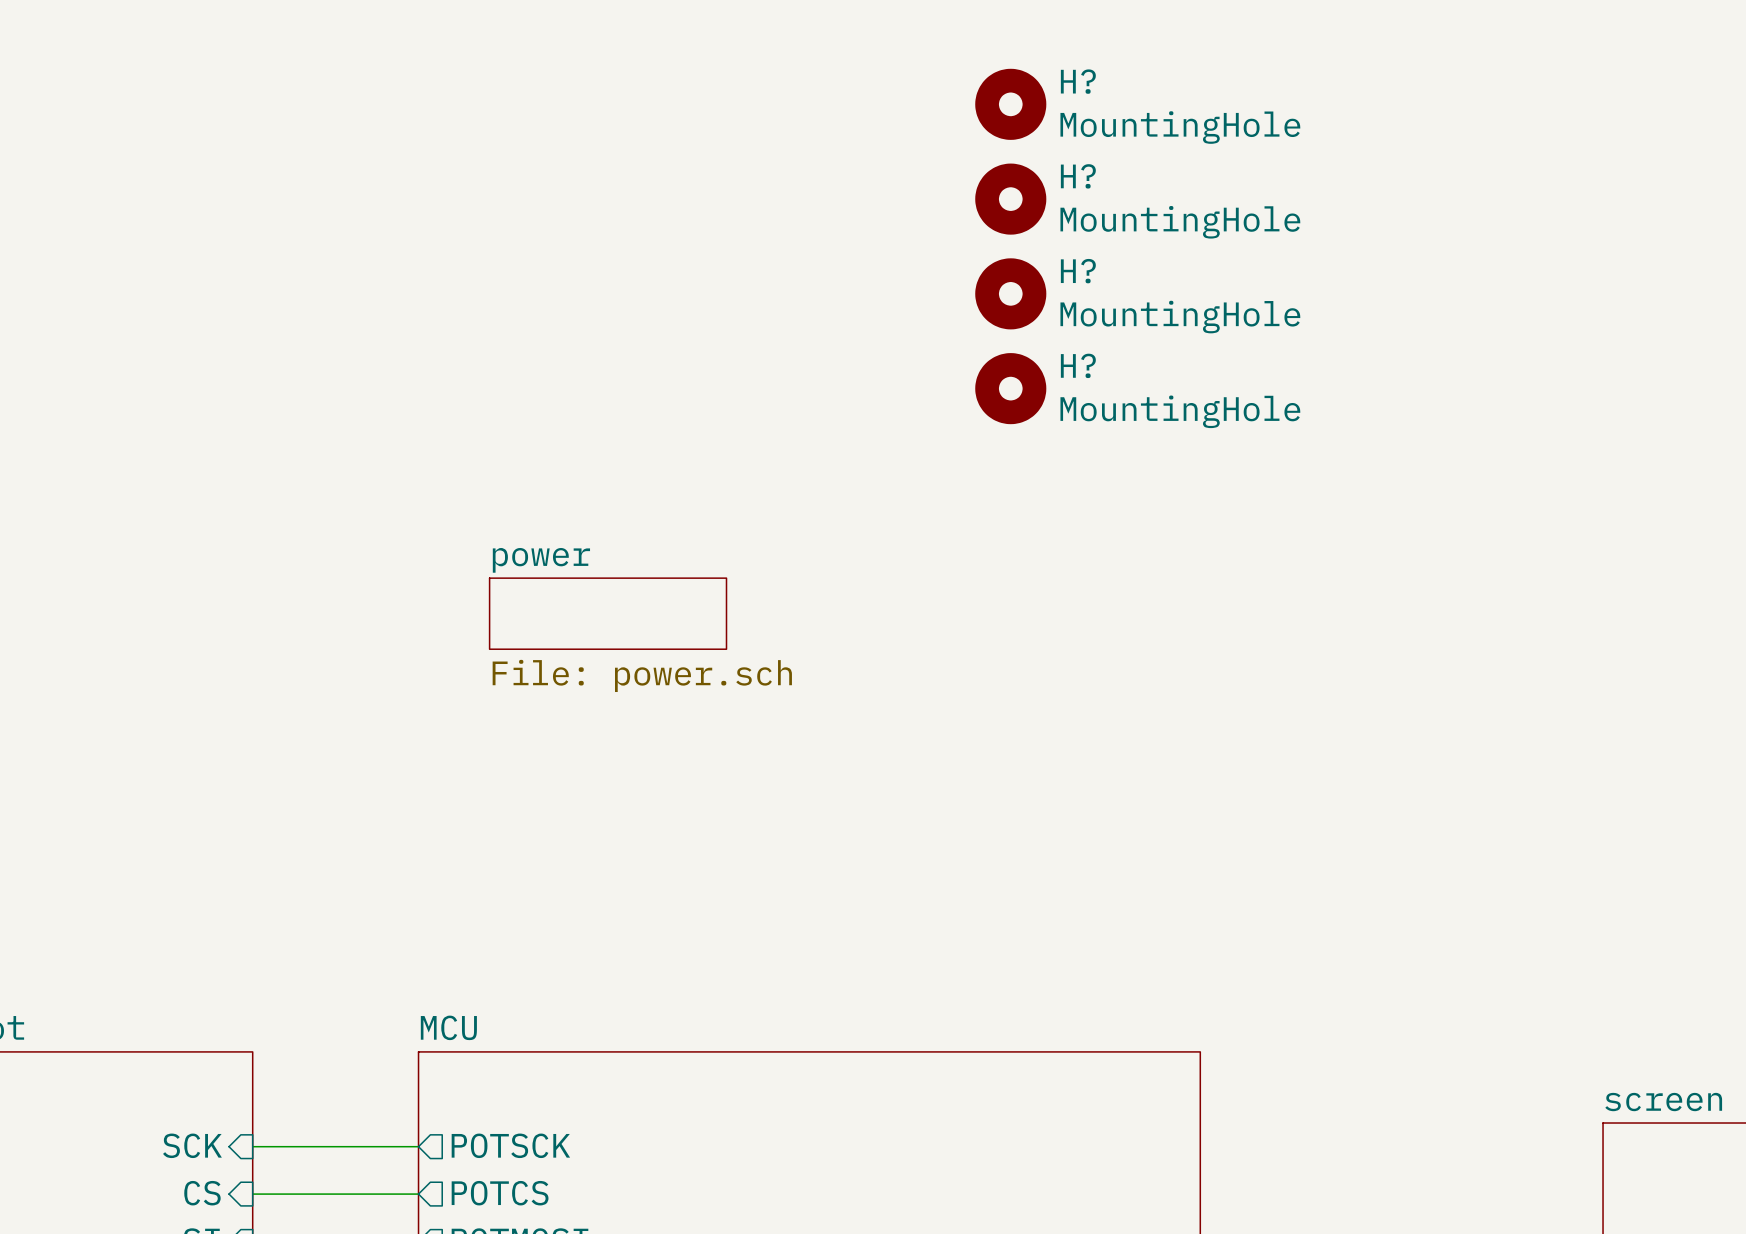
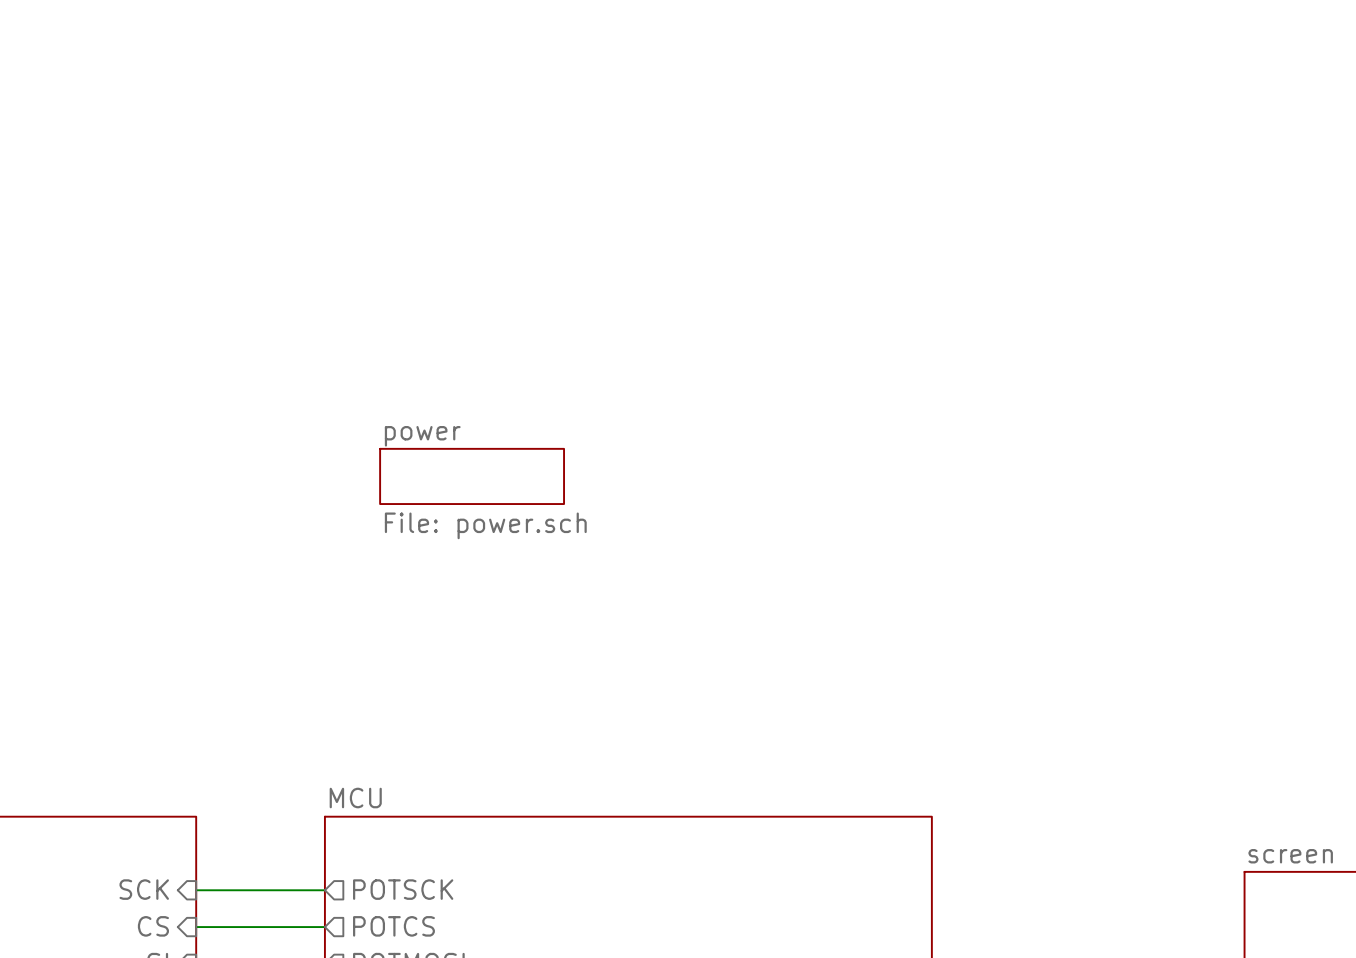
H?: MountingHole (1010, 104) -> none
H?: MountingHole (1010, 199) -> none
H?: MountingHole (1010, 293) -> none
H?: MountingHole (1010, 388) -> none

